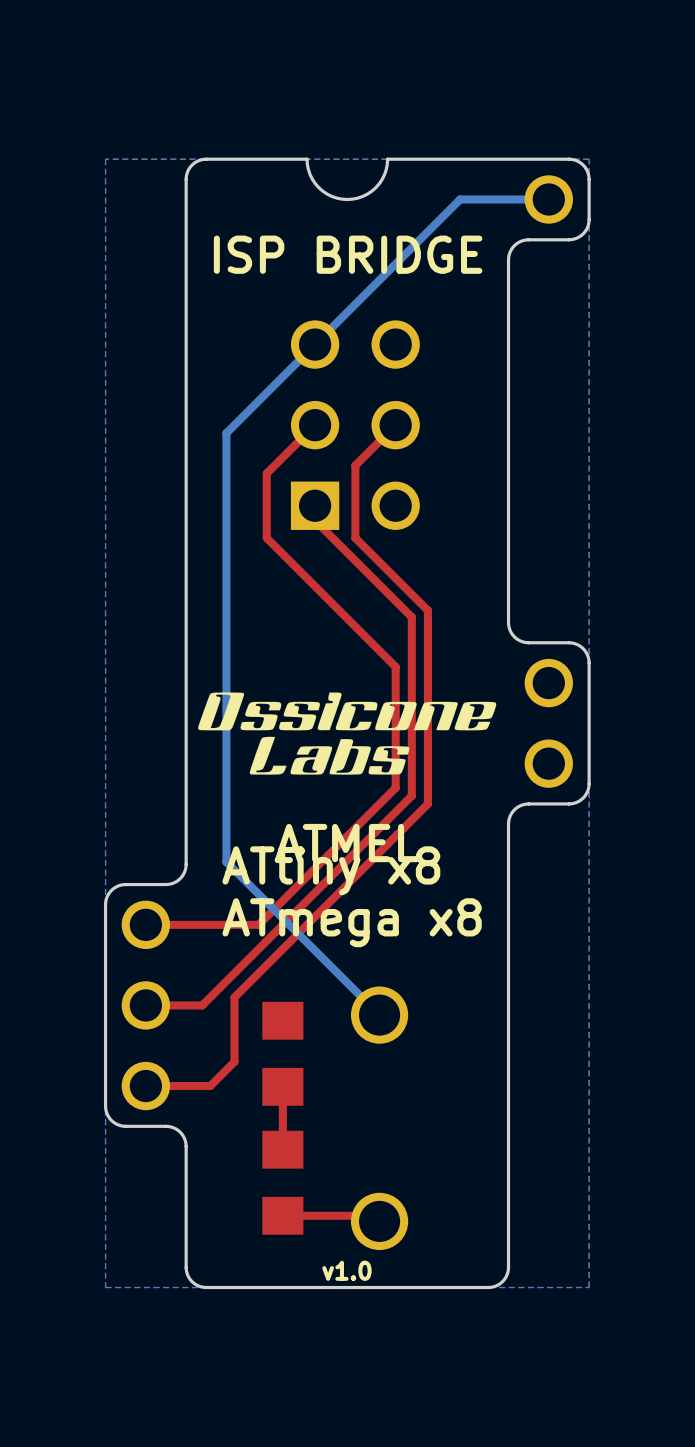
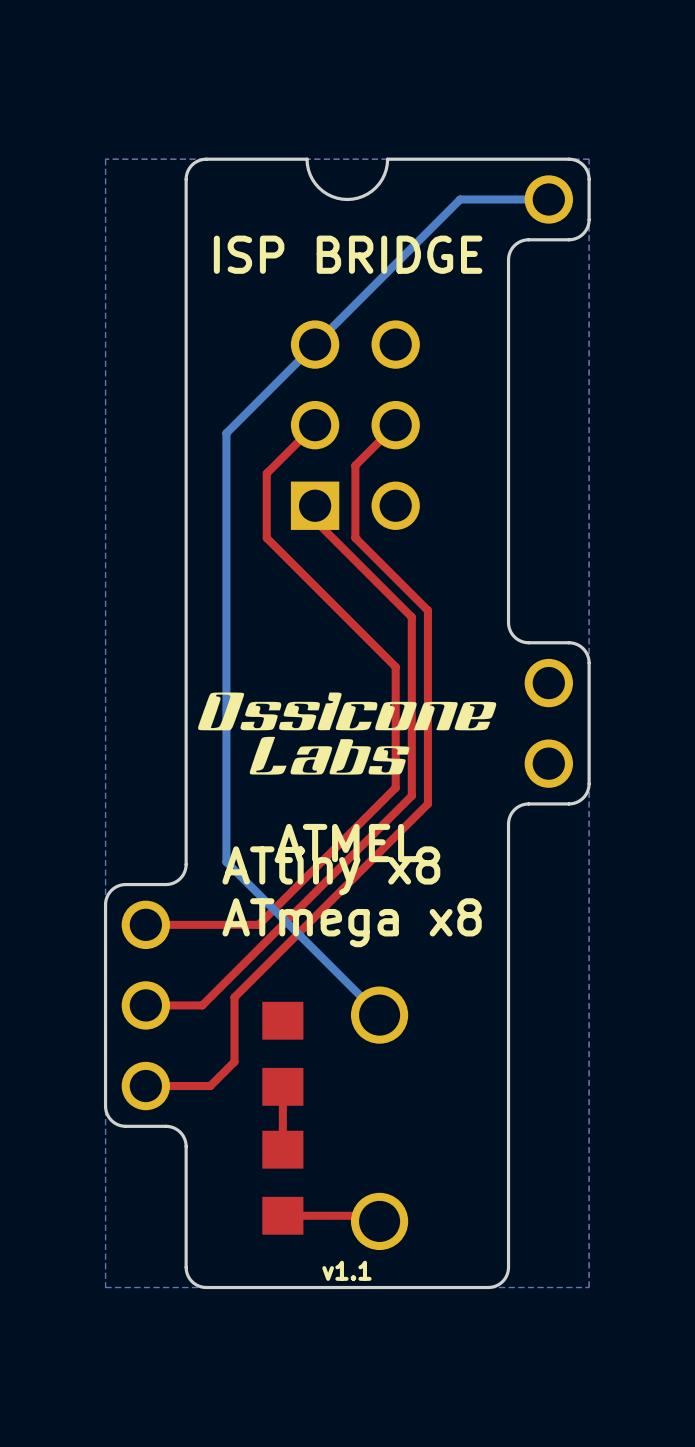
text: v1.0 (346, 1270) -> v1.1 (346, 1270)

